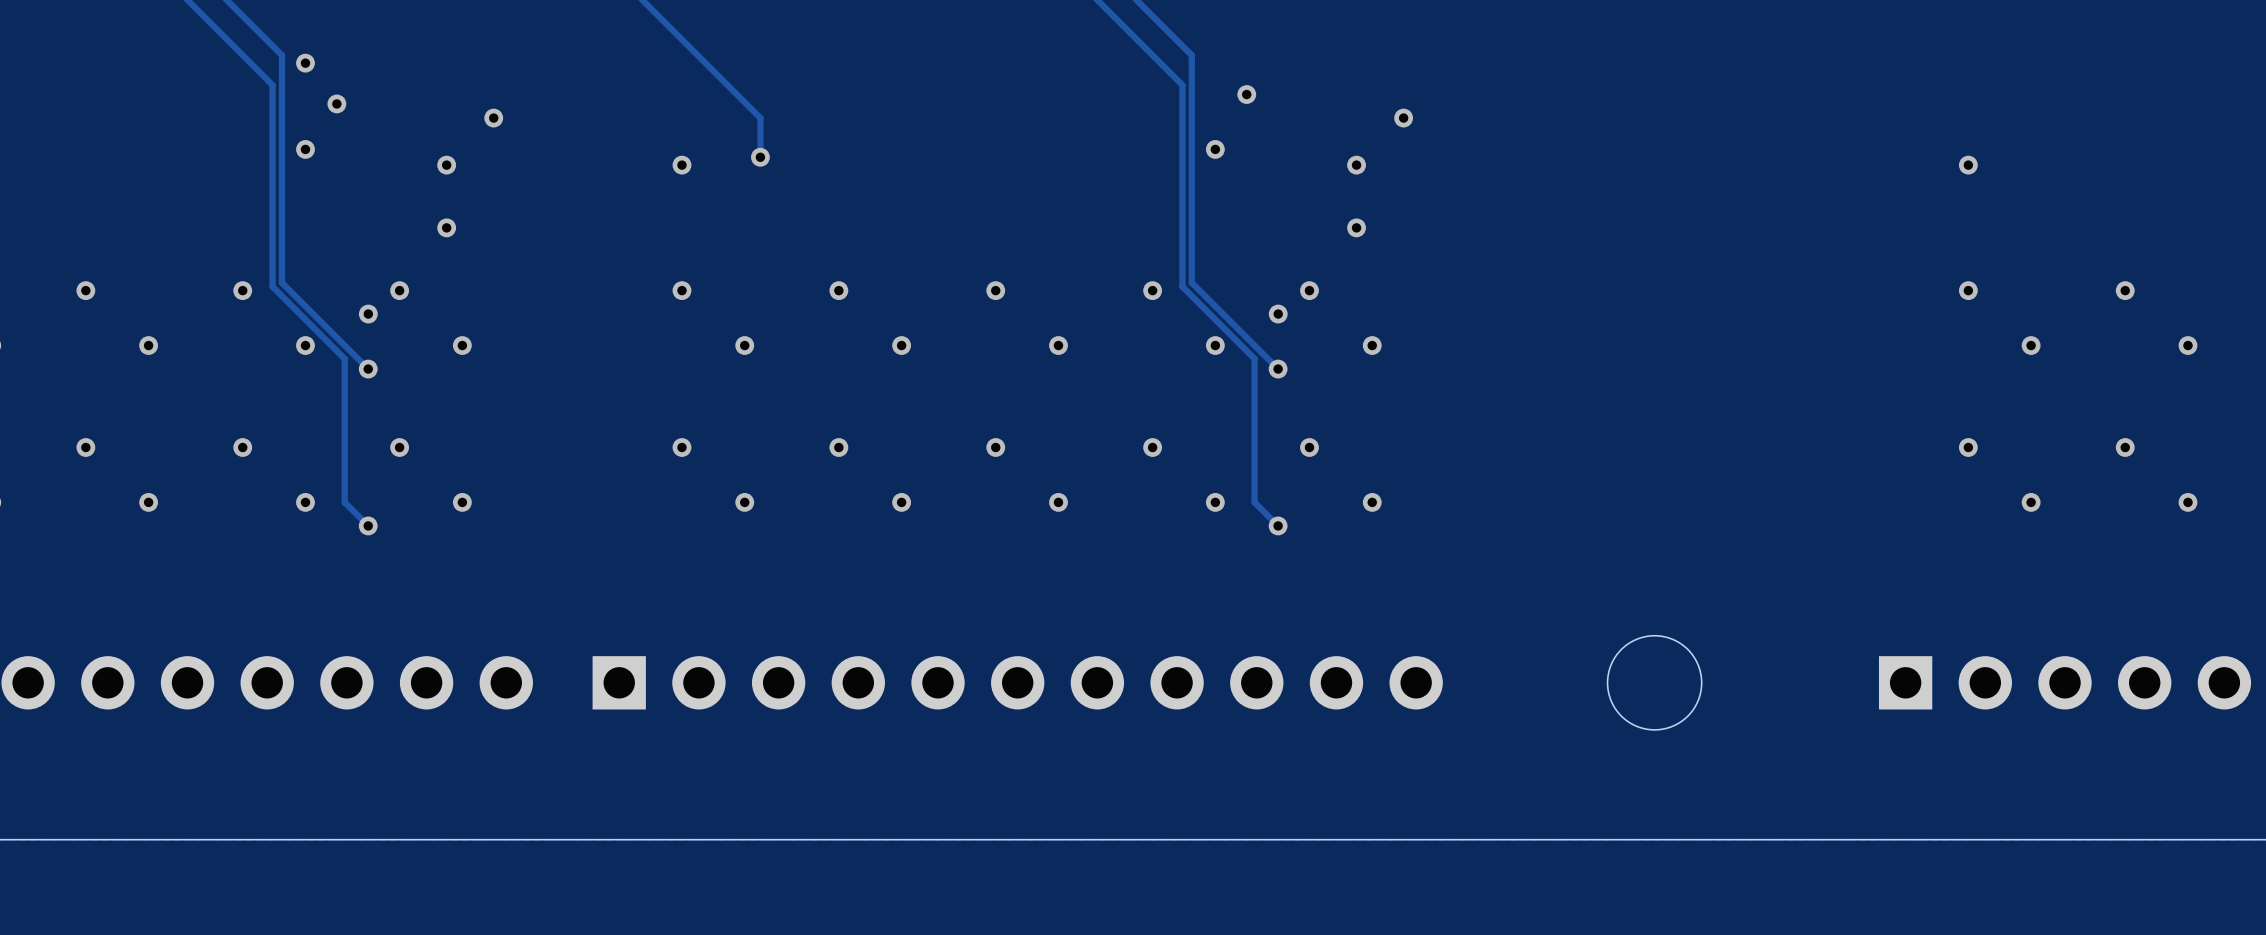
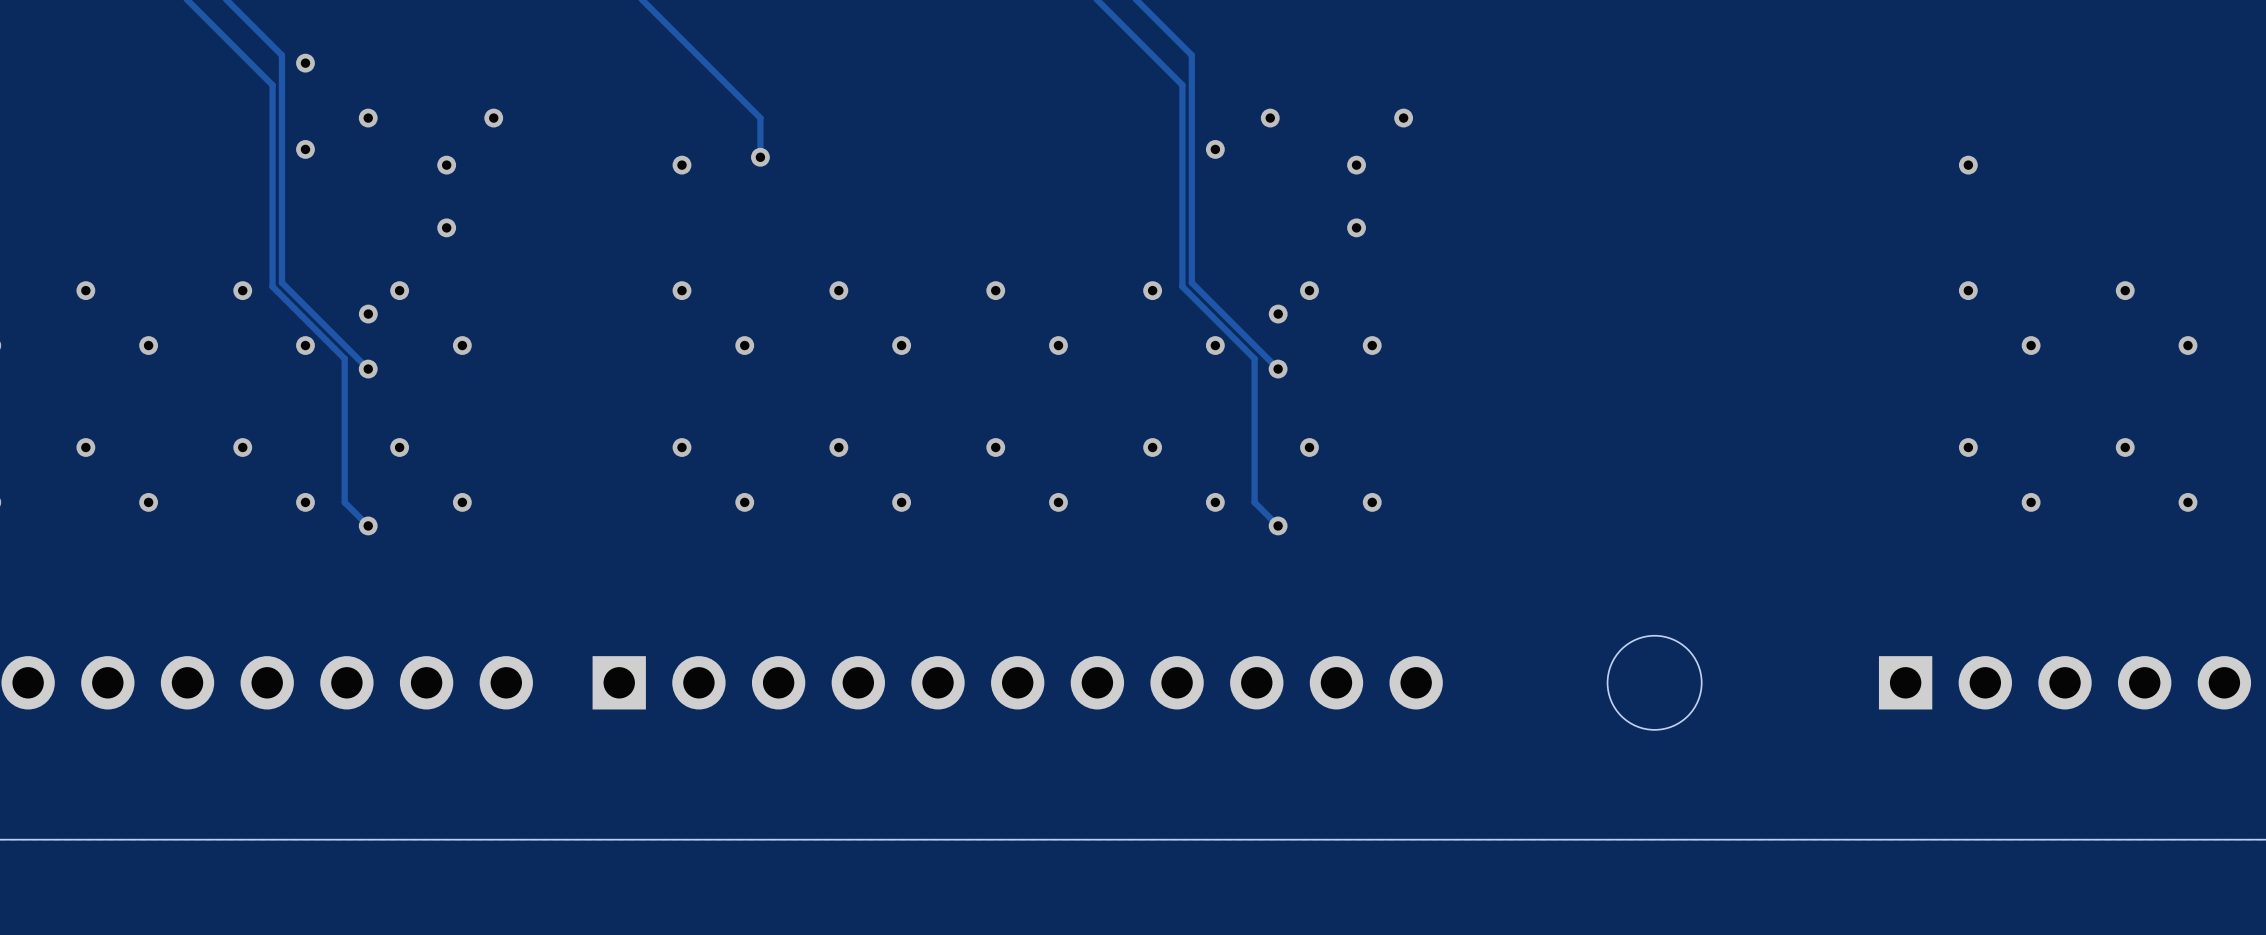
via position: (1246, 94) -> (1270, 118)
via position: (336, 103) -> (368, 118)

